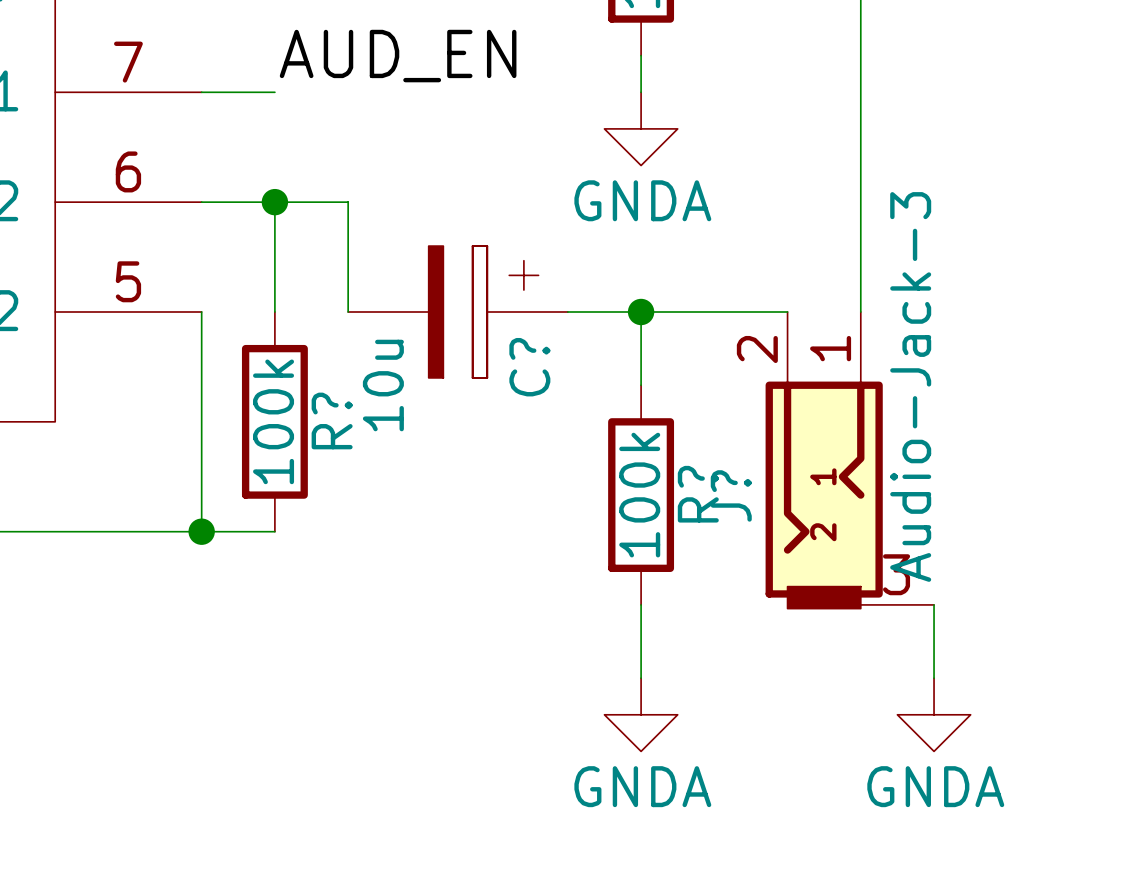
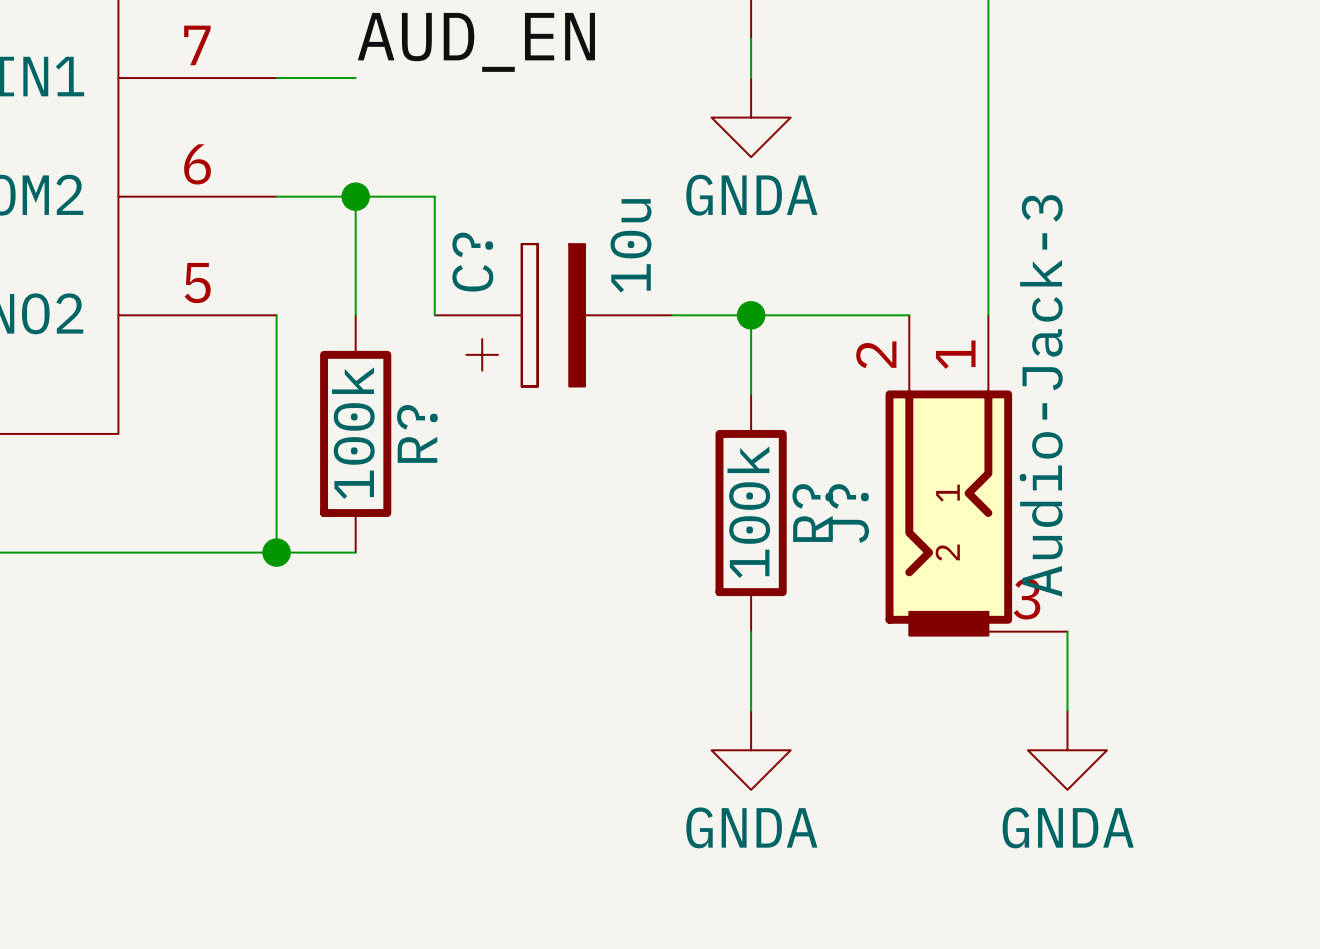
C? rotation: 0° (483, 312) -> 180° (525, 315)

